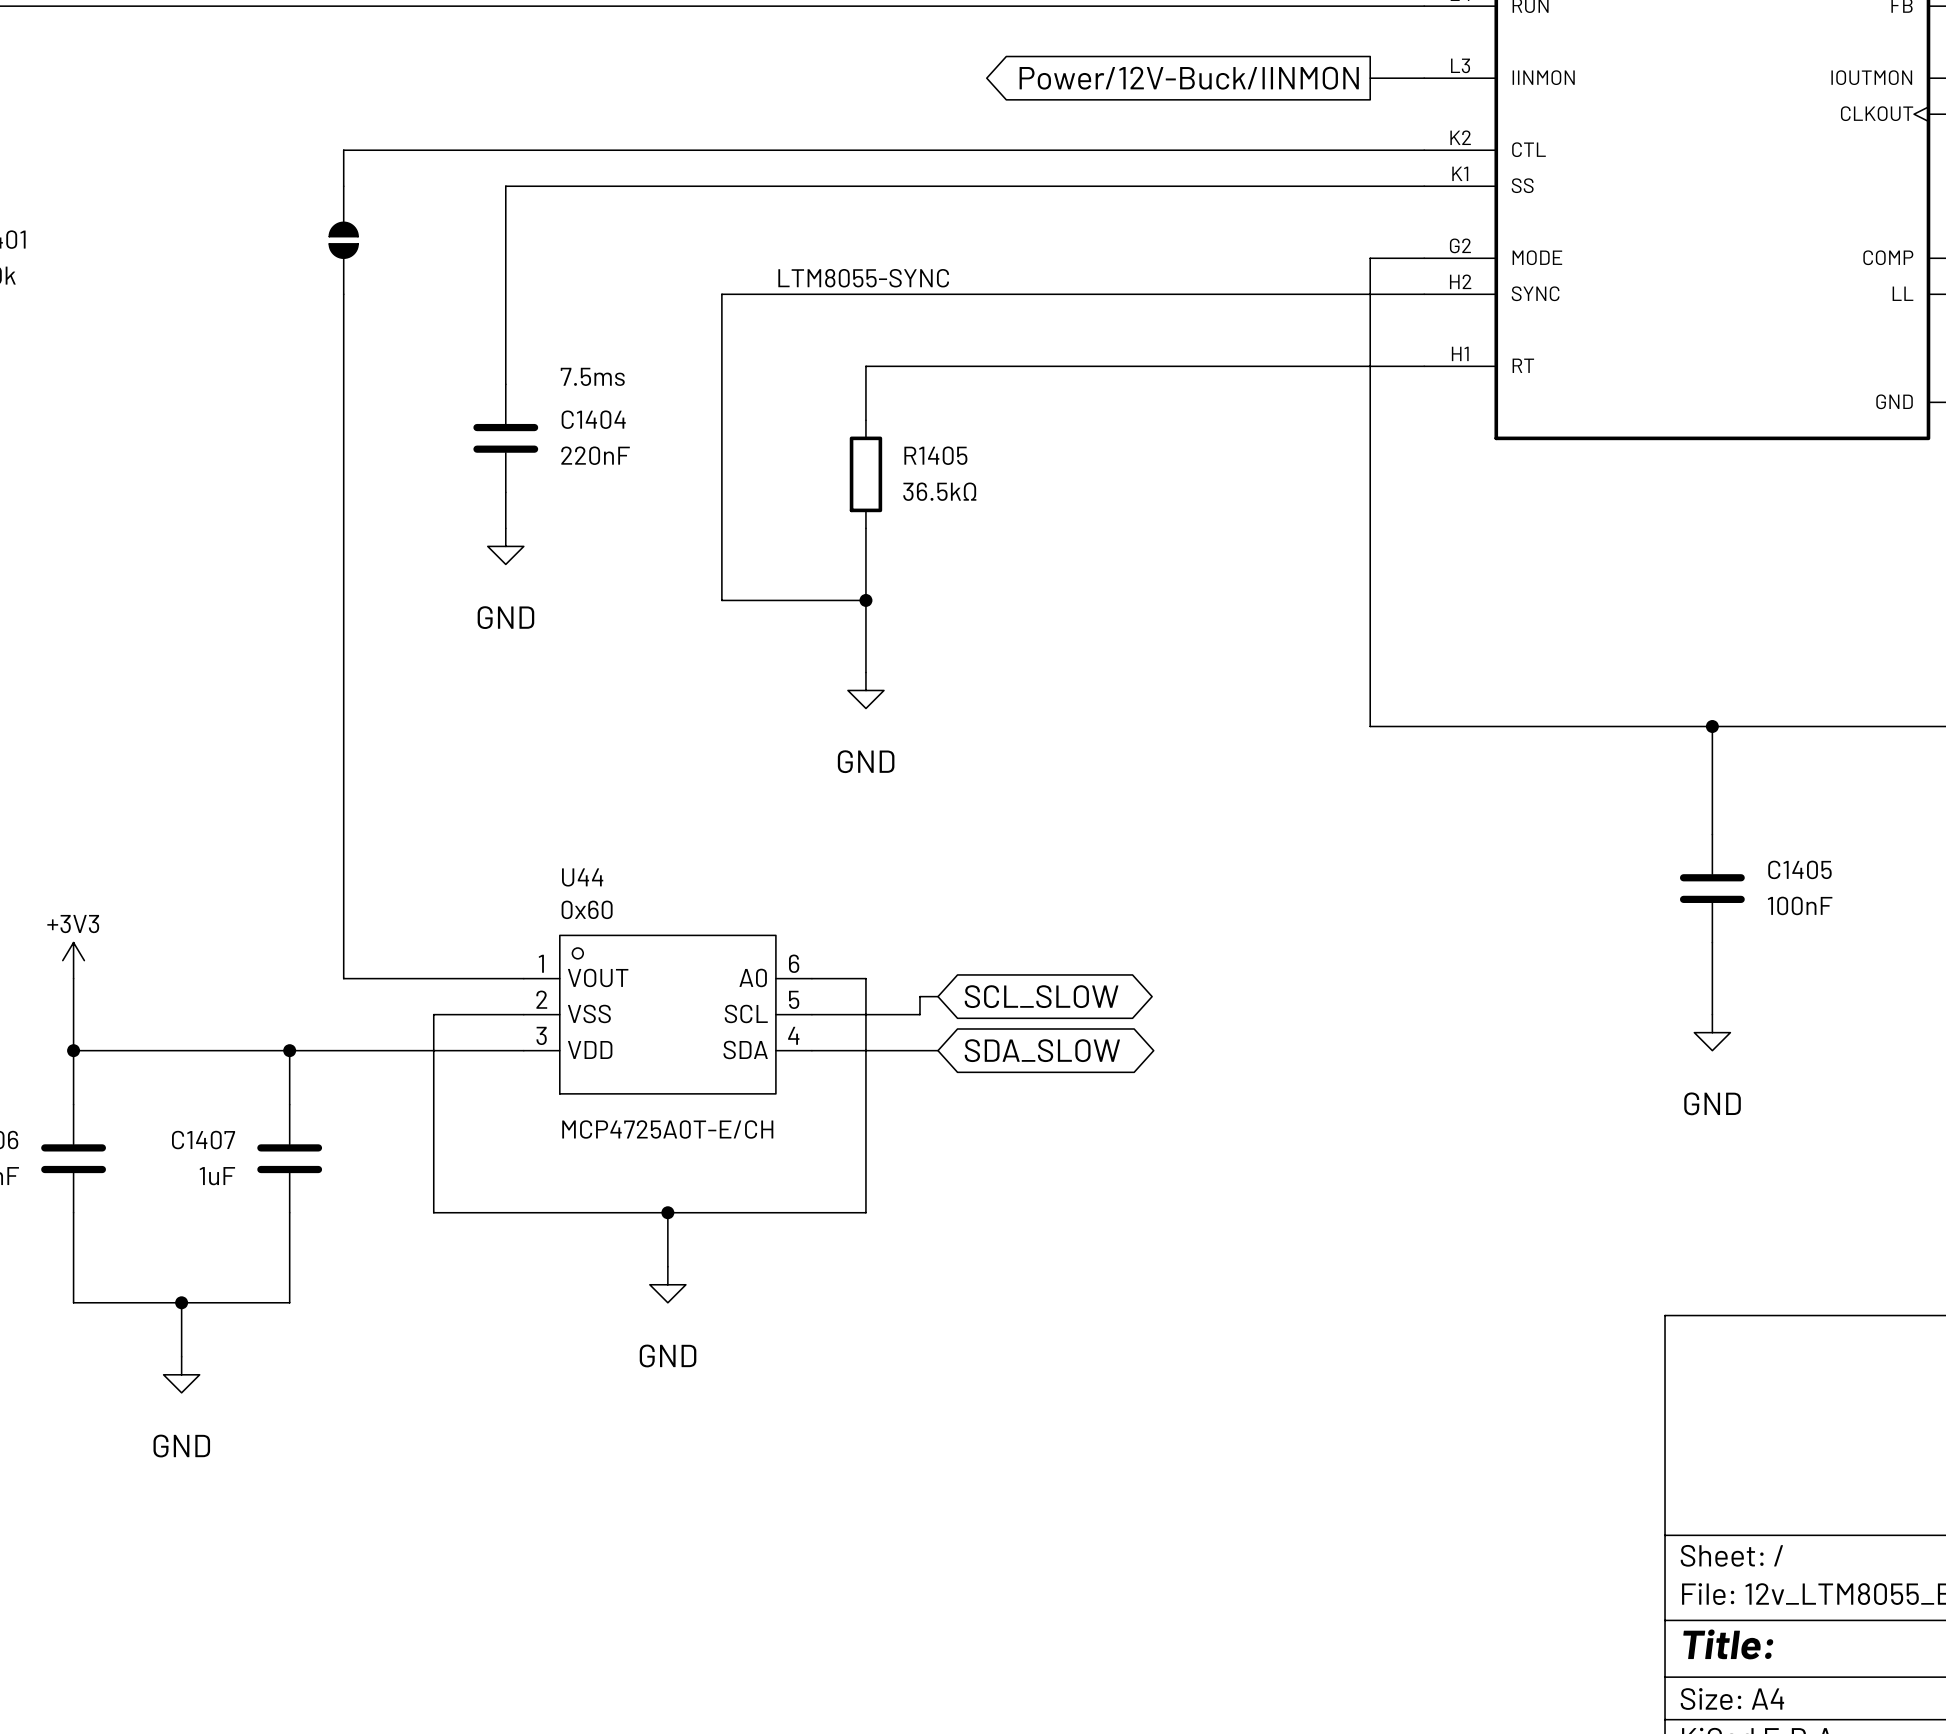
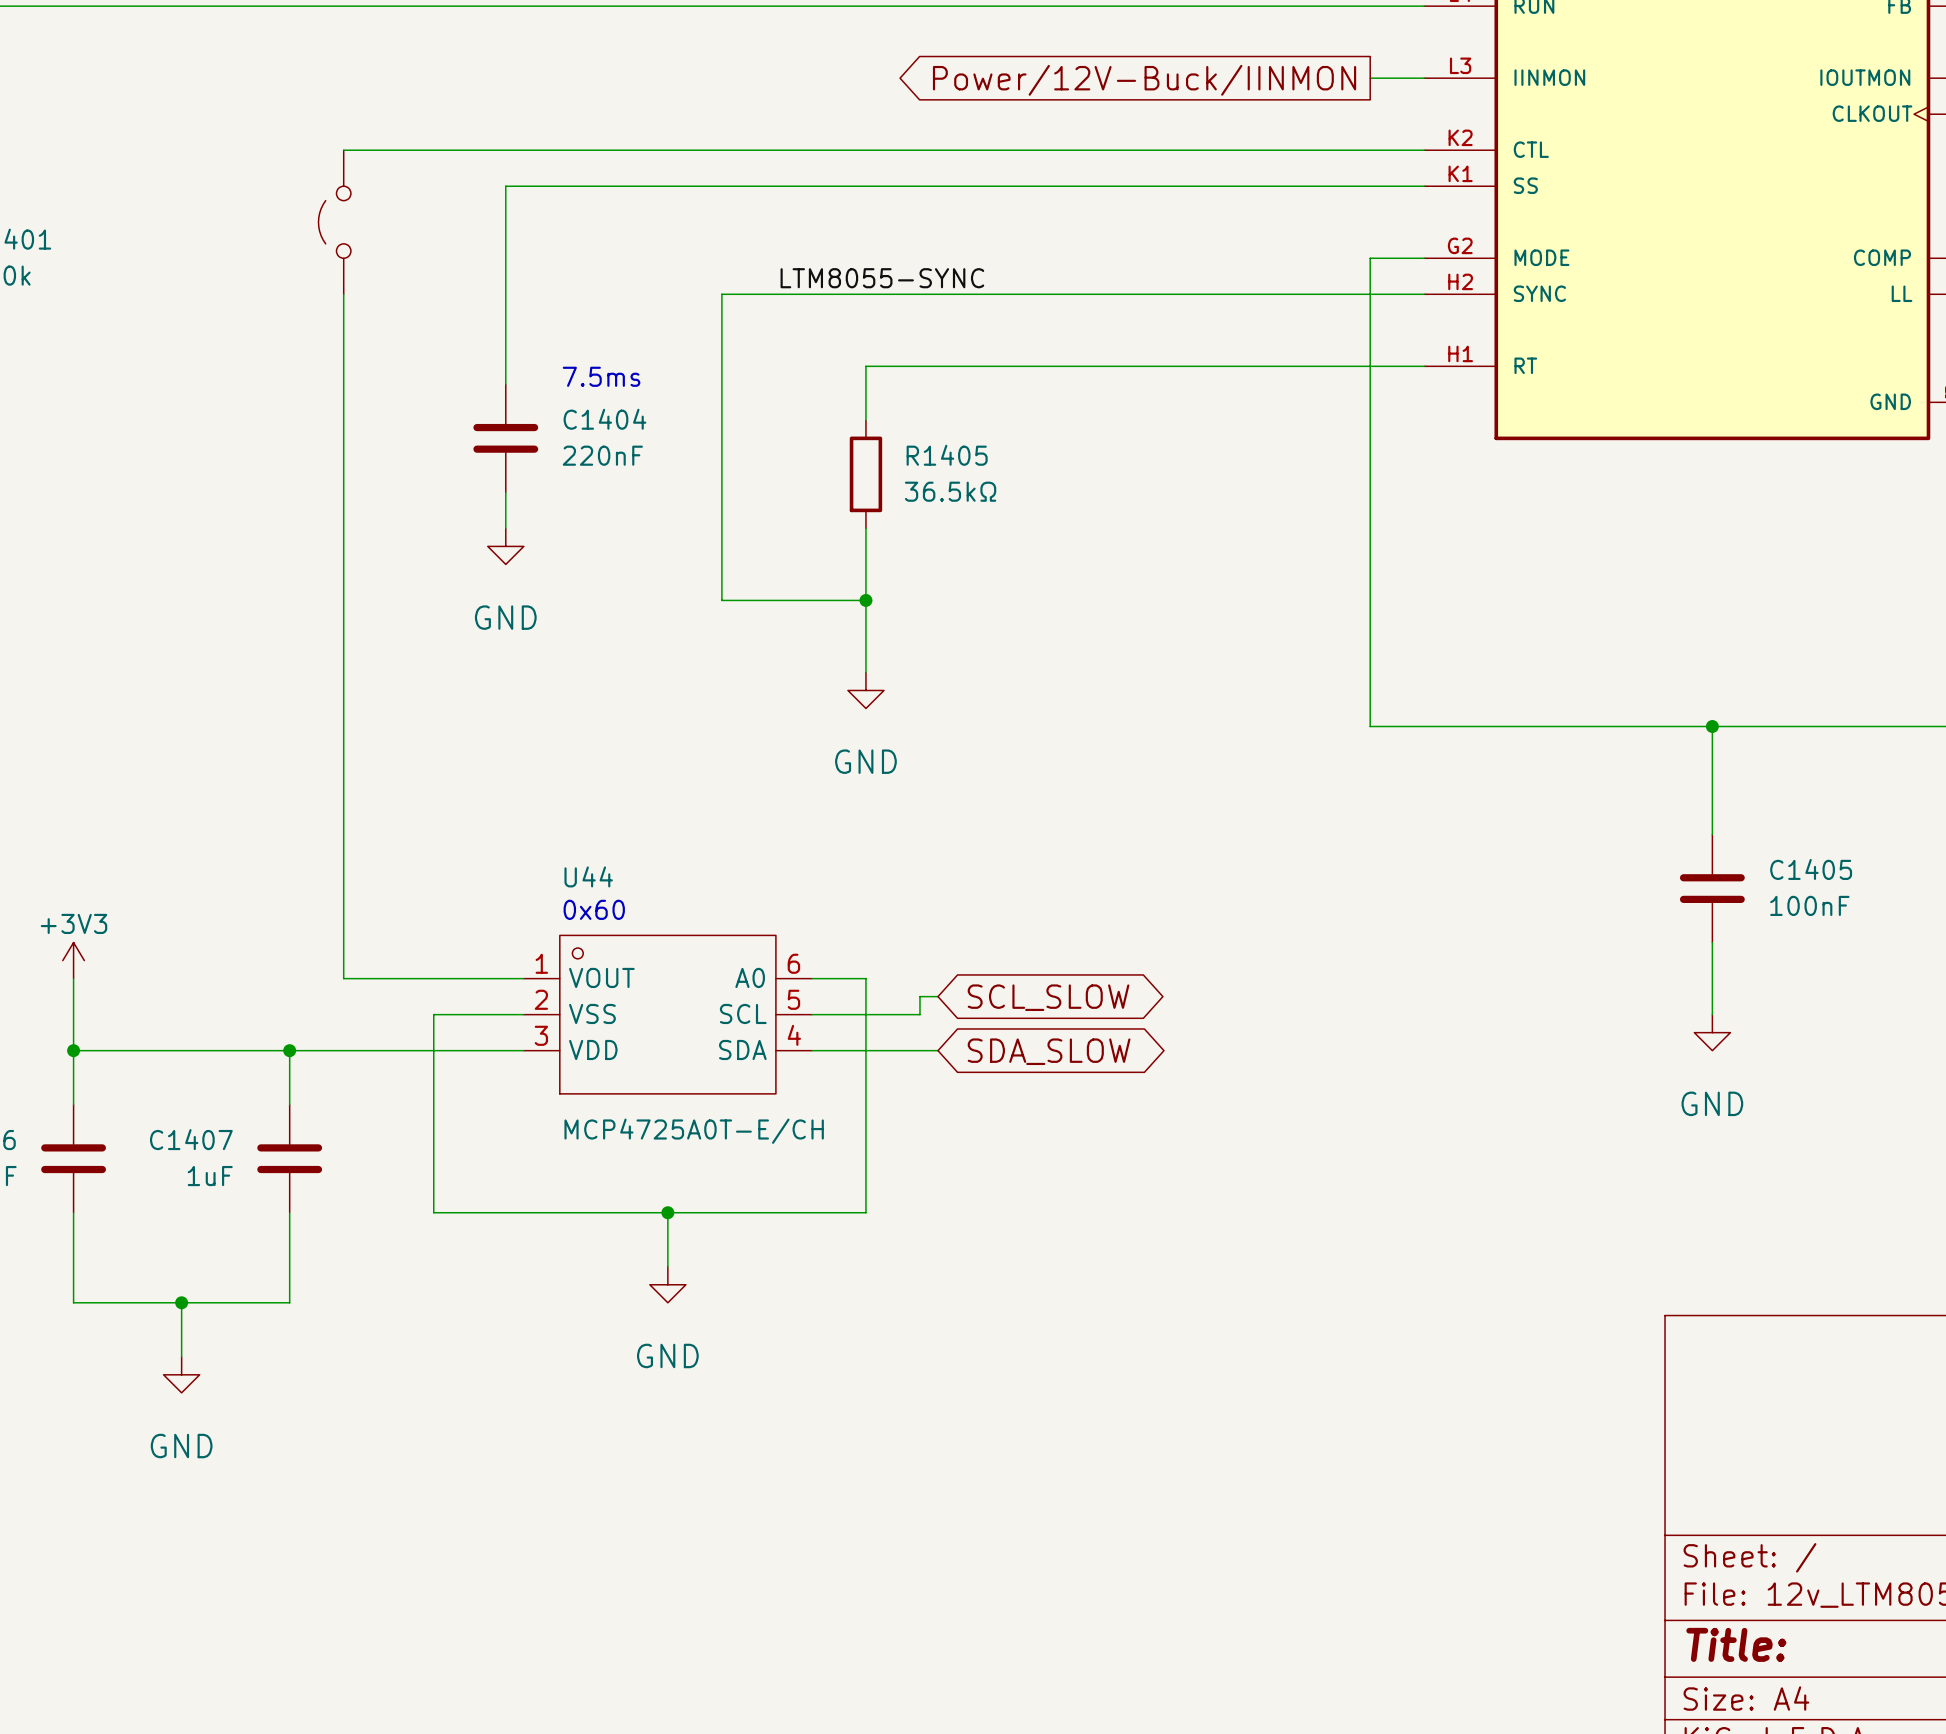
part: none -> (334, 222)
part: (343, 240) -> none

